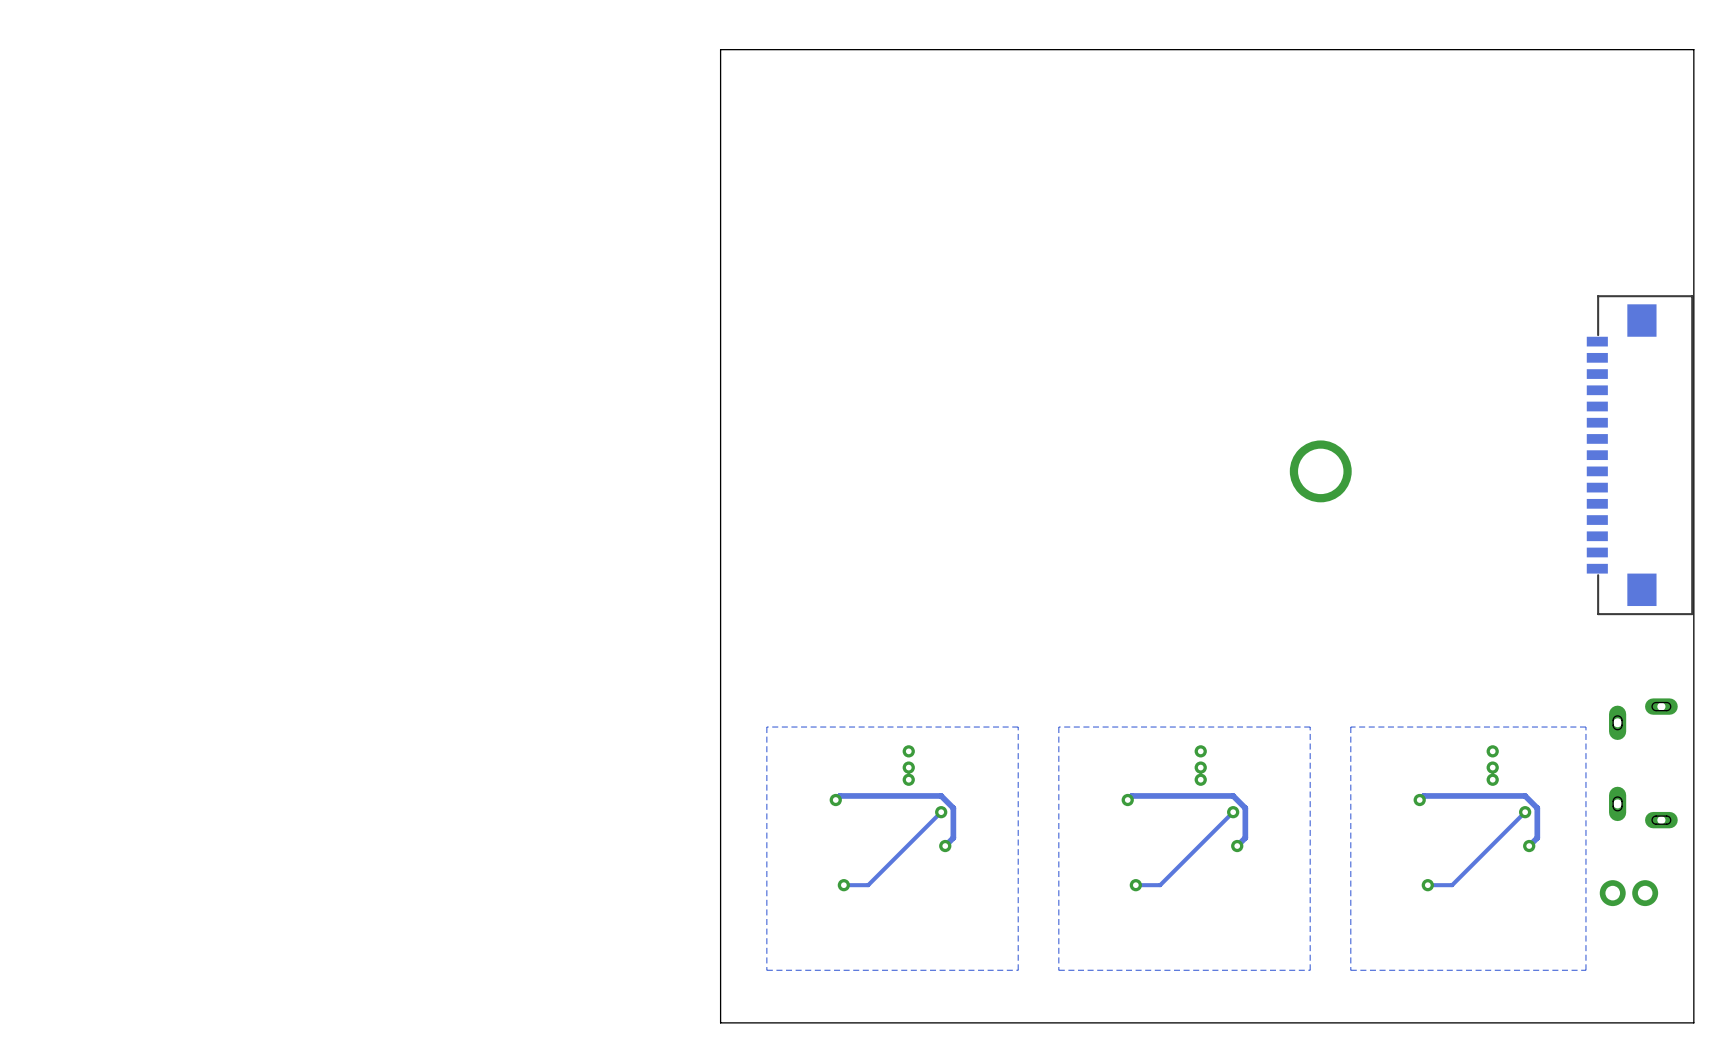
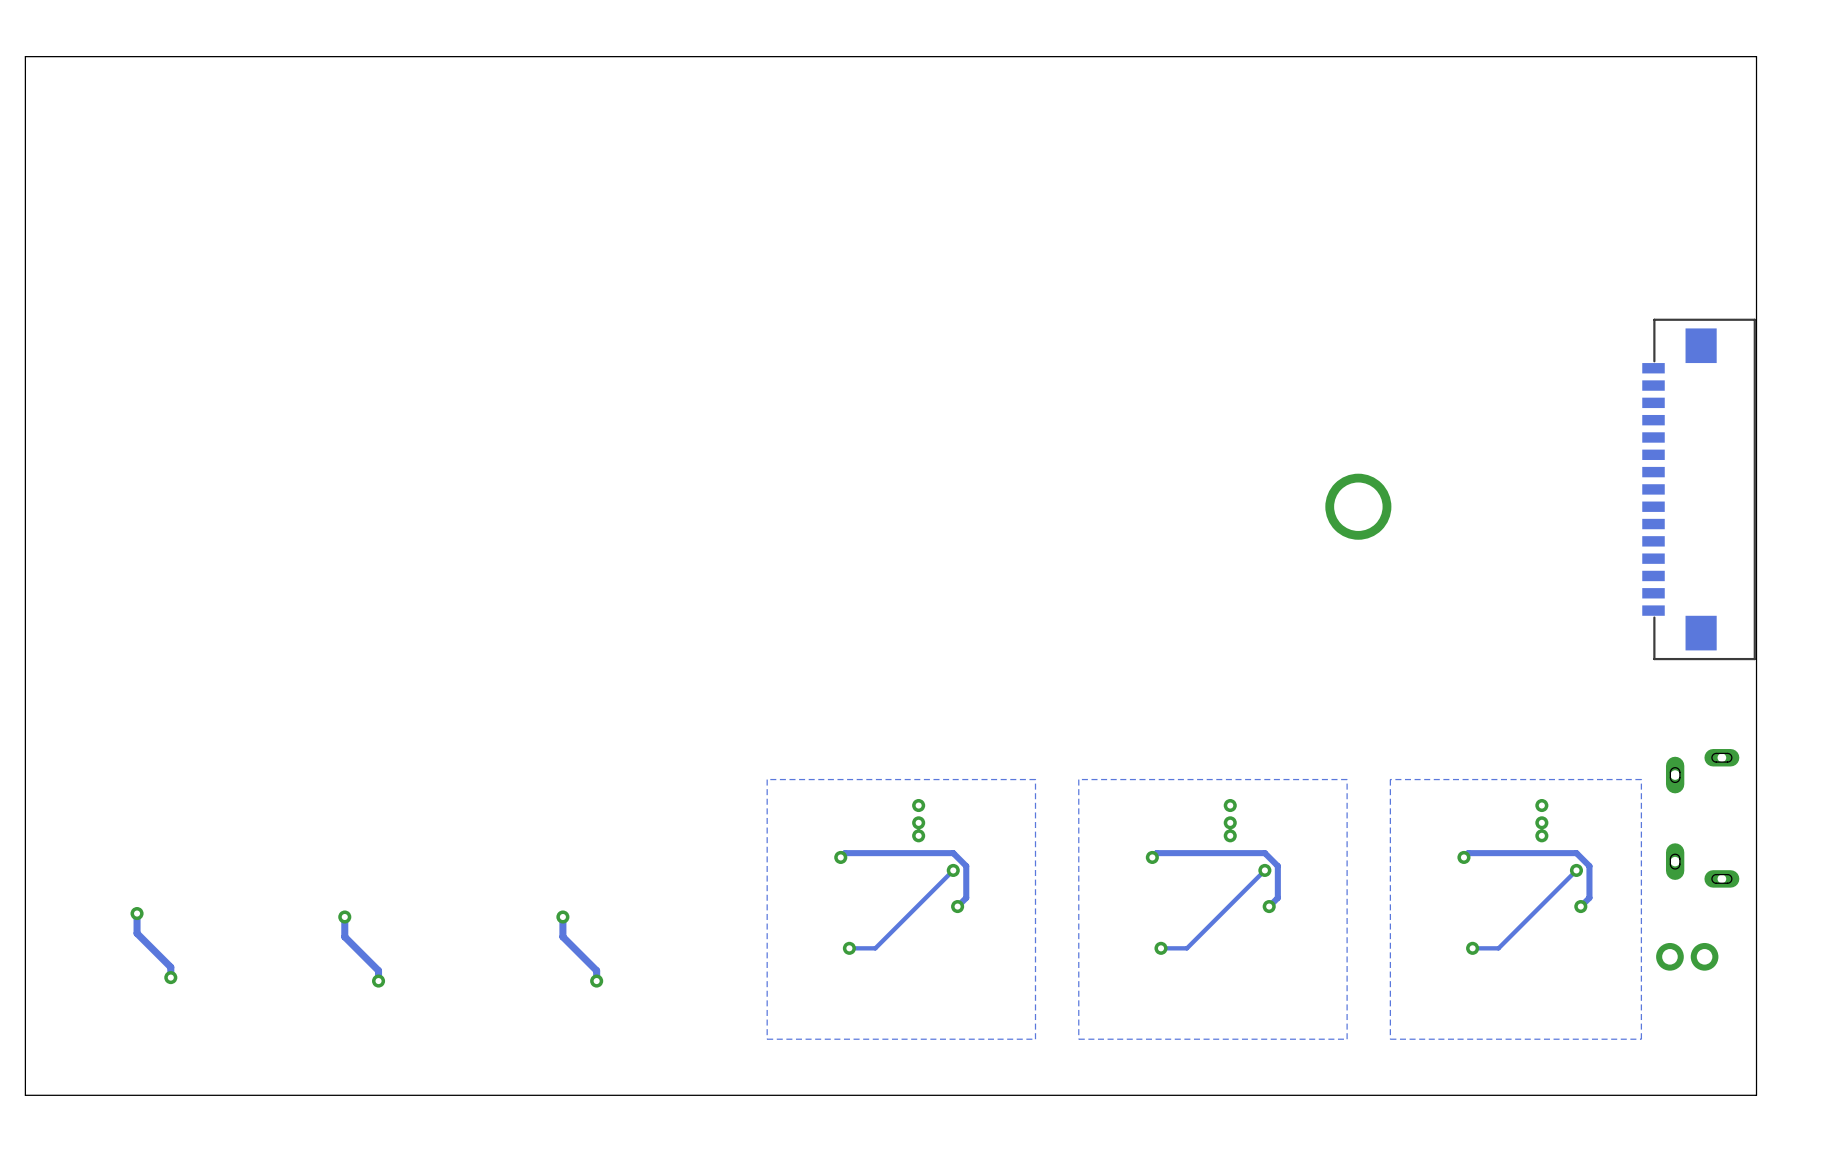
board edge: (720, 49) (720, 1022) -> (717, 56) (25, 56) (25, 1095) (717, 1095)
track: none -> (137, 913) (137, 933) (170, 967) (170, 977)
via: none -> (137, 913)
track: none -> (344, 917) (344, 936) (378, 970) (378, 981)
via: none -> (344, 917)
track: none -> (562, 917) (562, 936) (596, 970) (596, 981)
via: none -> (562, 917)
via: none -> (170, 977)
via: none -> (378, 981)
via: none -> (596, 981)

